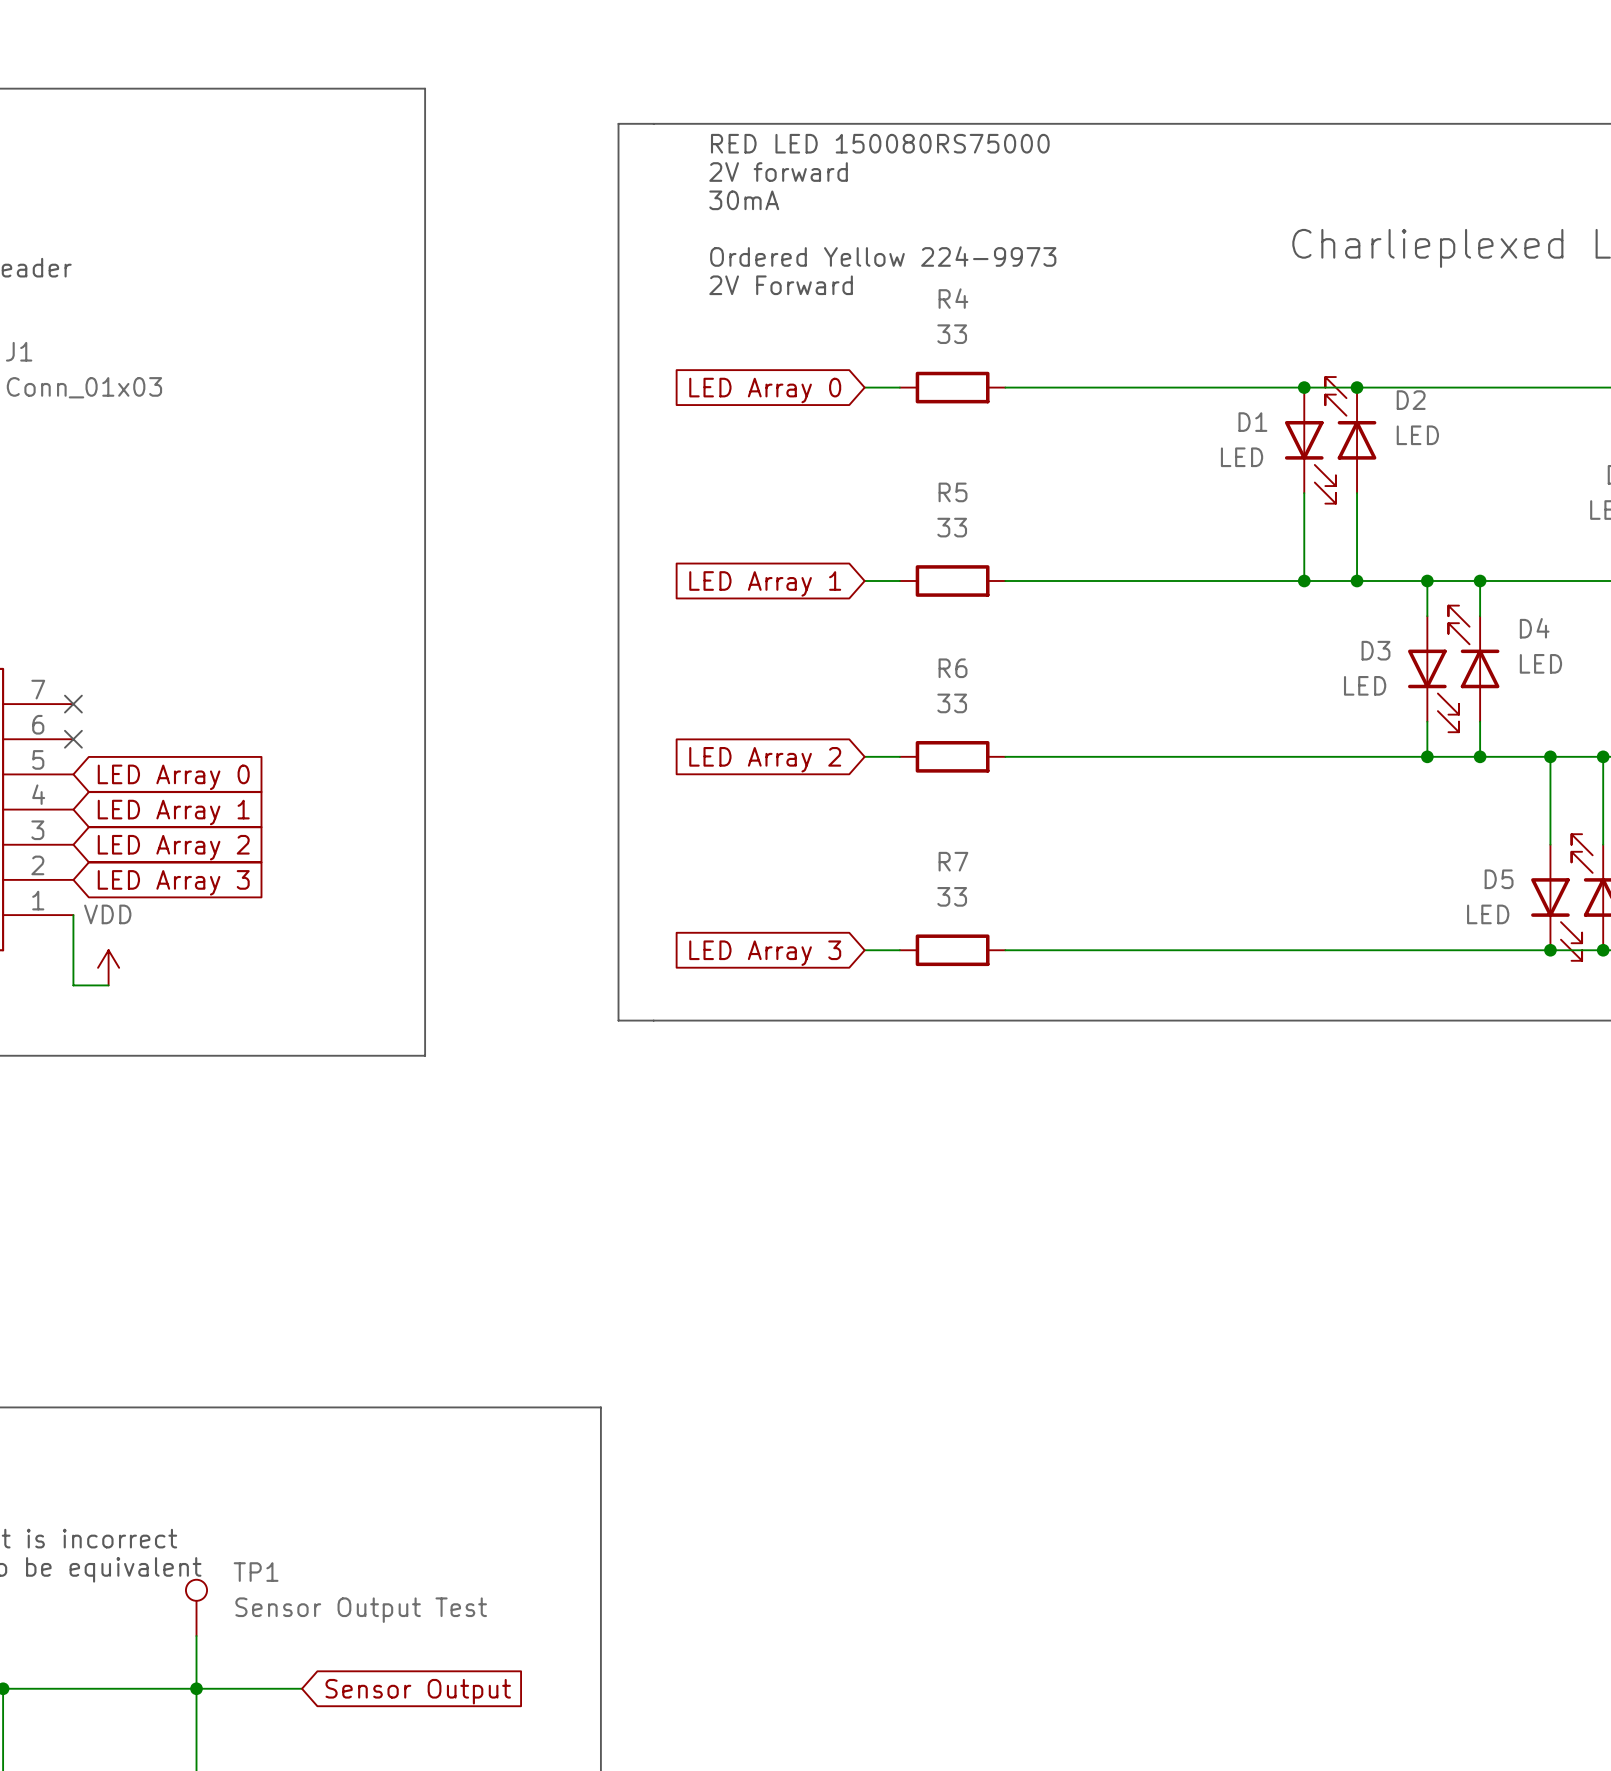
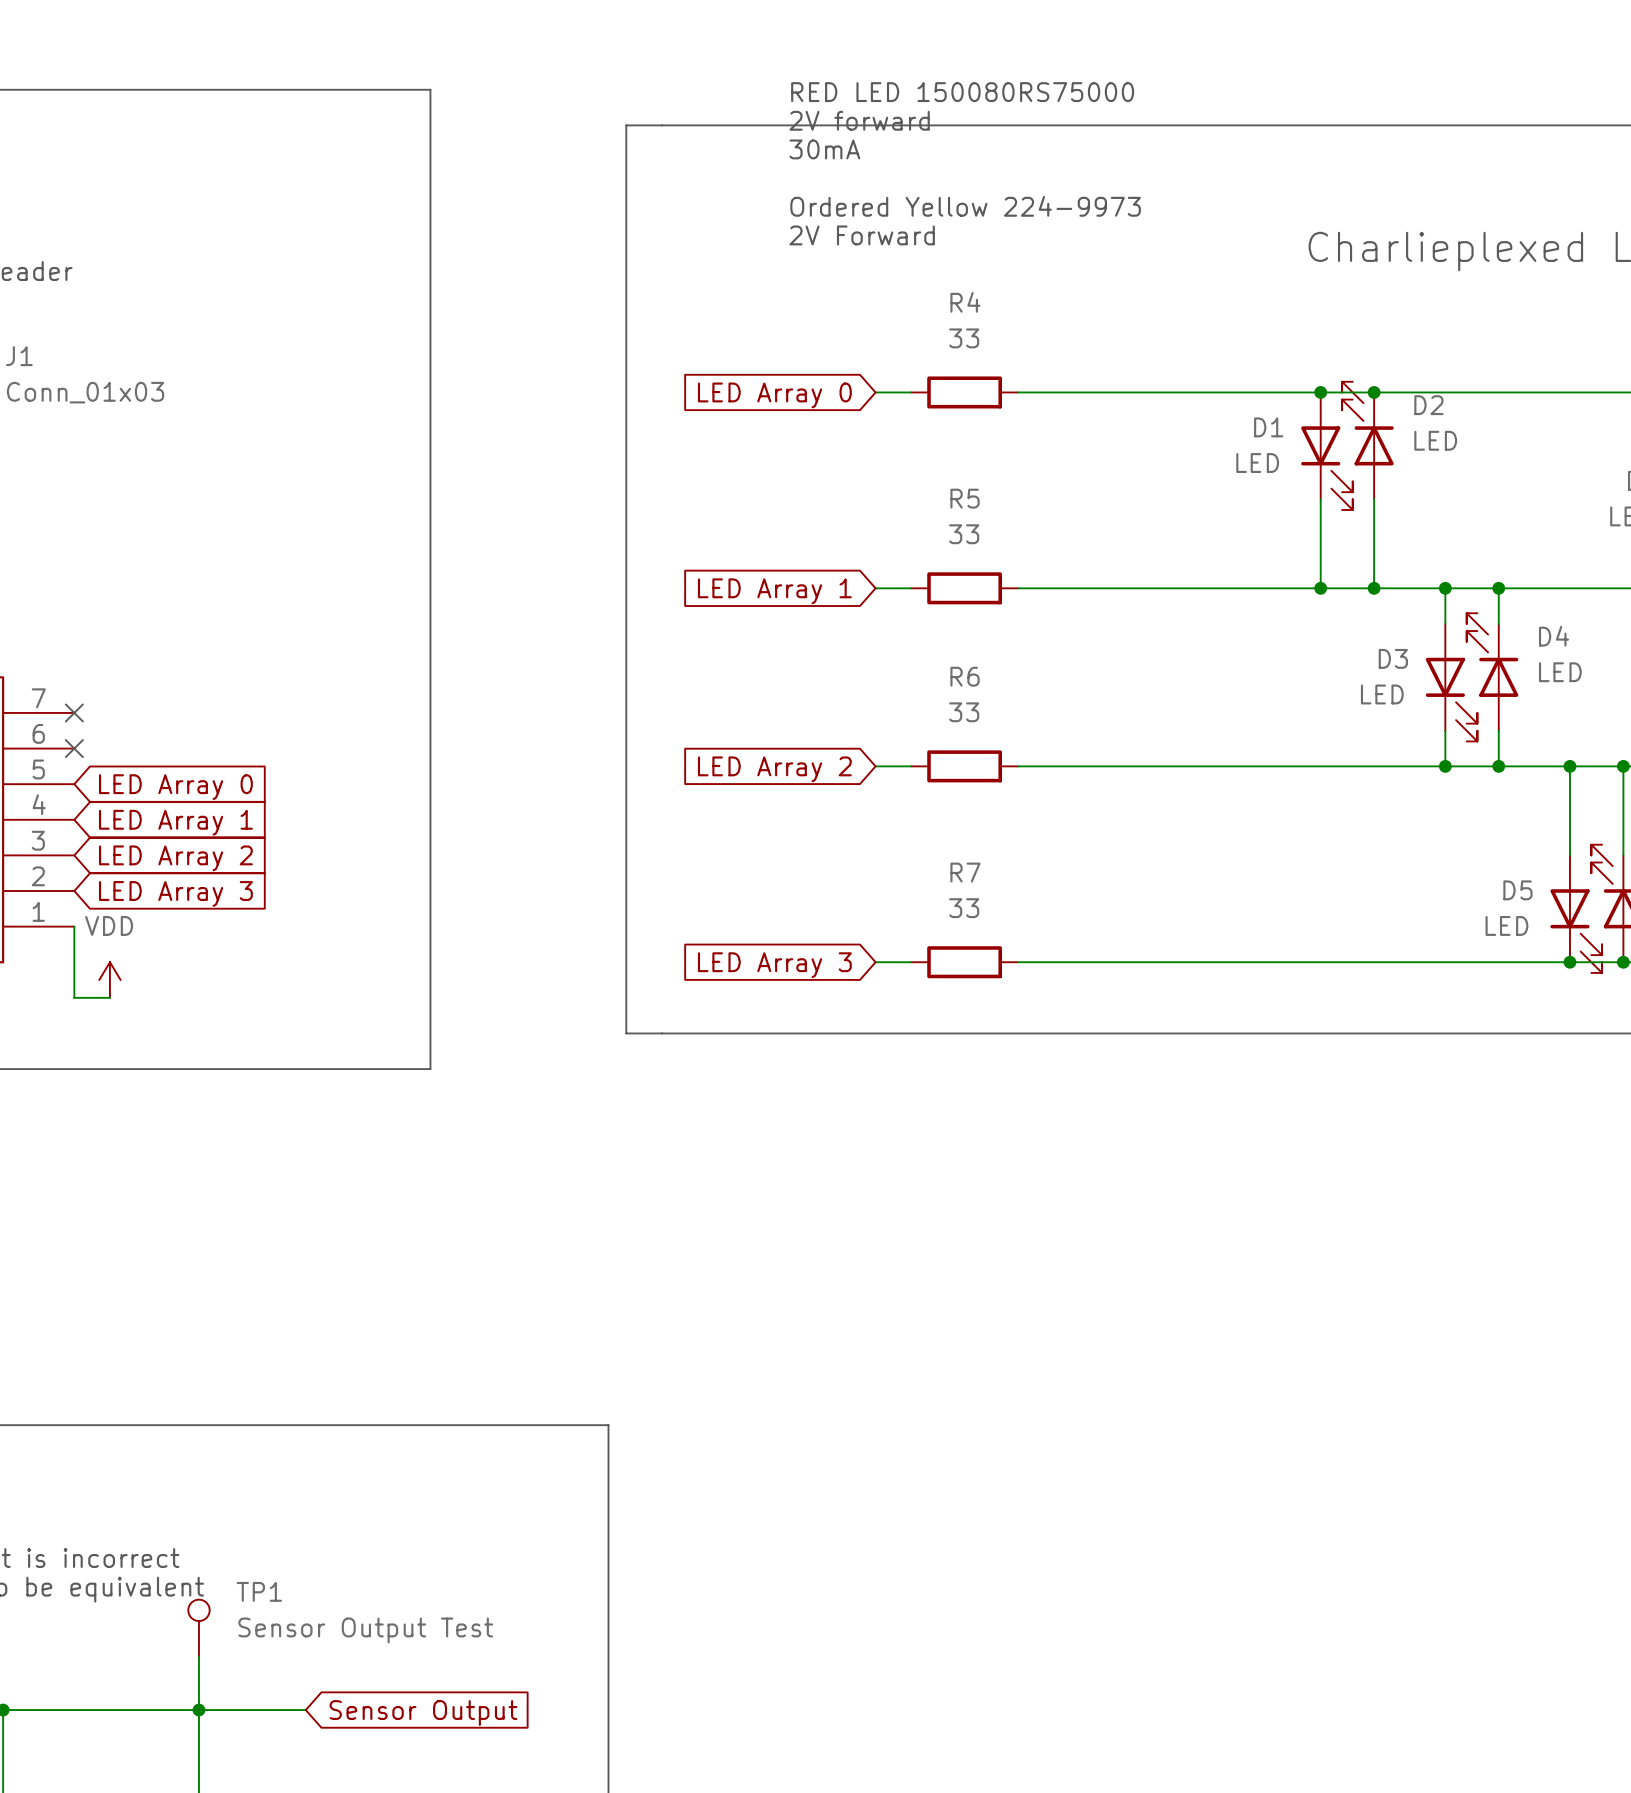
text position: RED LED 150080RS75000 (880, 143) -> RED LED 150080RS75000 (962, 92)
text position: 2V forward (778, 172) -> 2V forward (859, 120)
text position: 30mA (744, 200) -> 30mA (824, 149)
text position: Ordered Yellow 224-9973 (883, 256) -> Ordered Yellow 224-9973 (965, 206)
text position: 2V Forward (781, 285) -> 2V Forward (862, 235)

